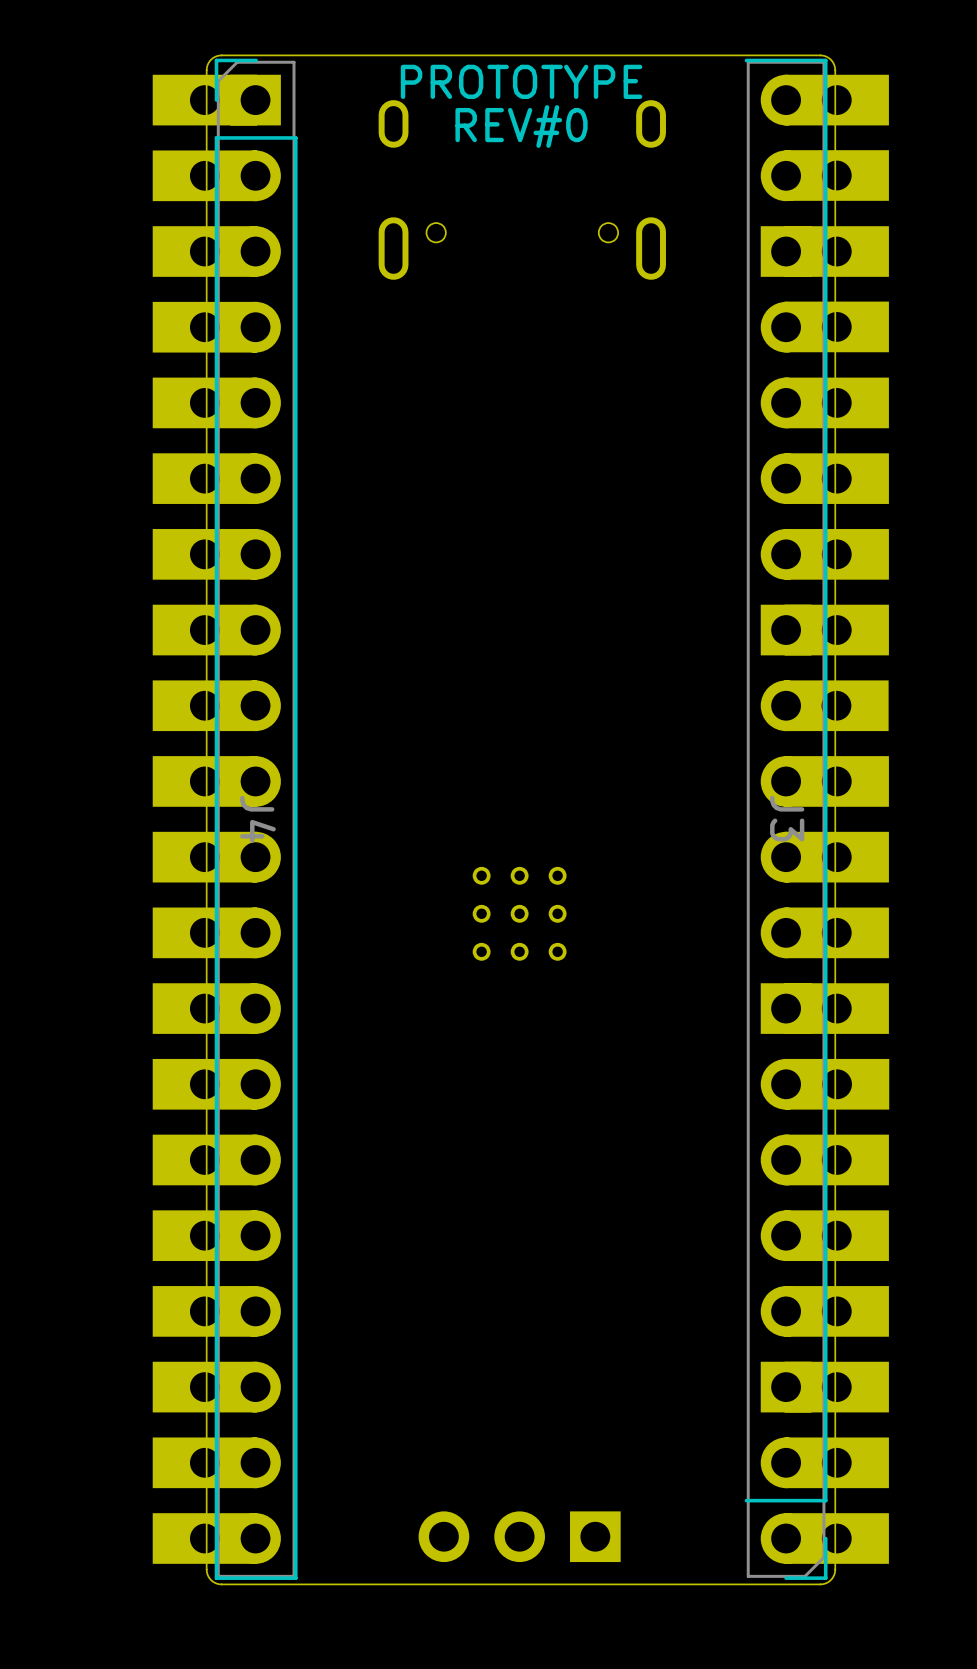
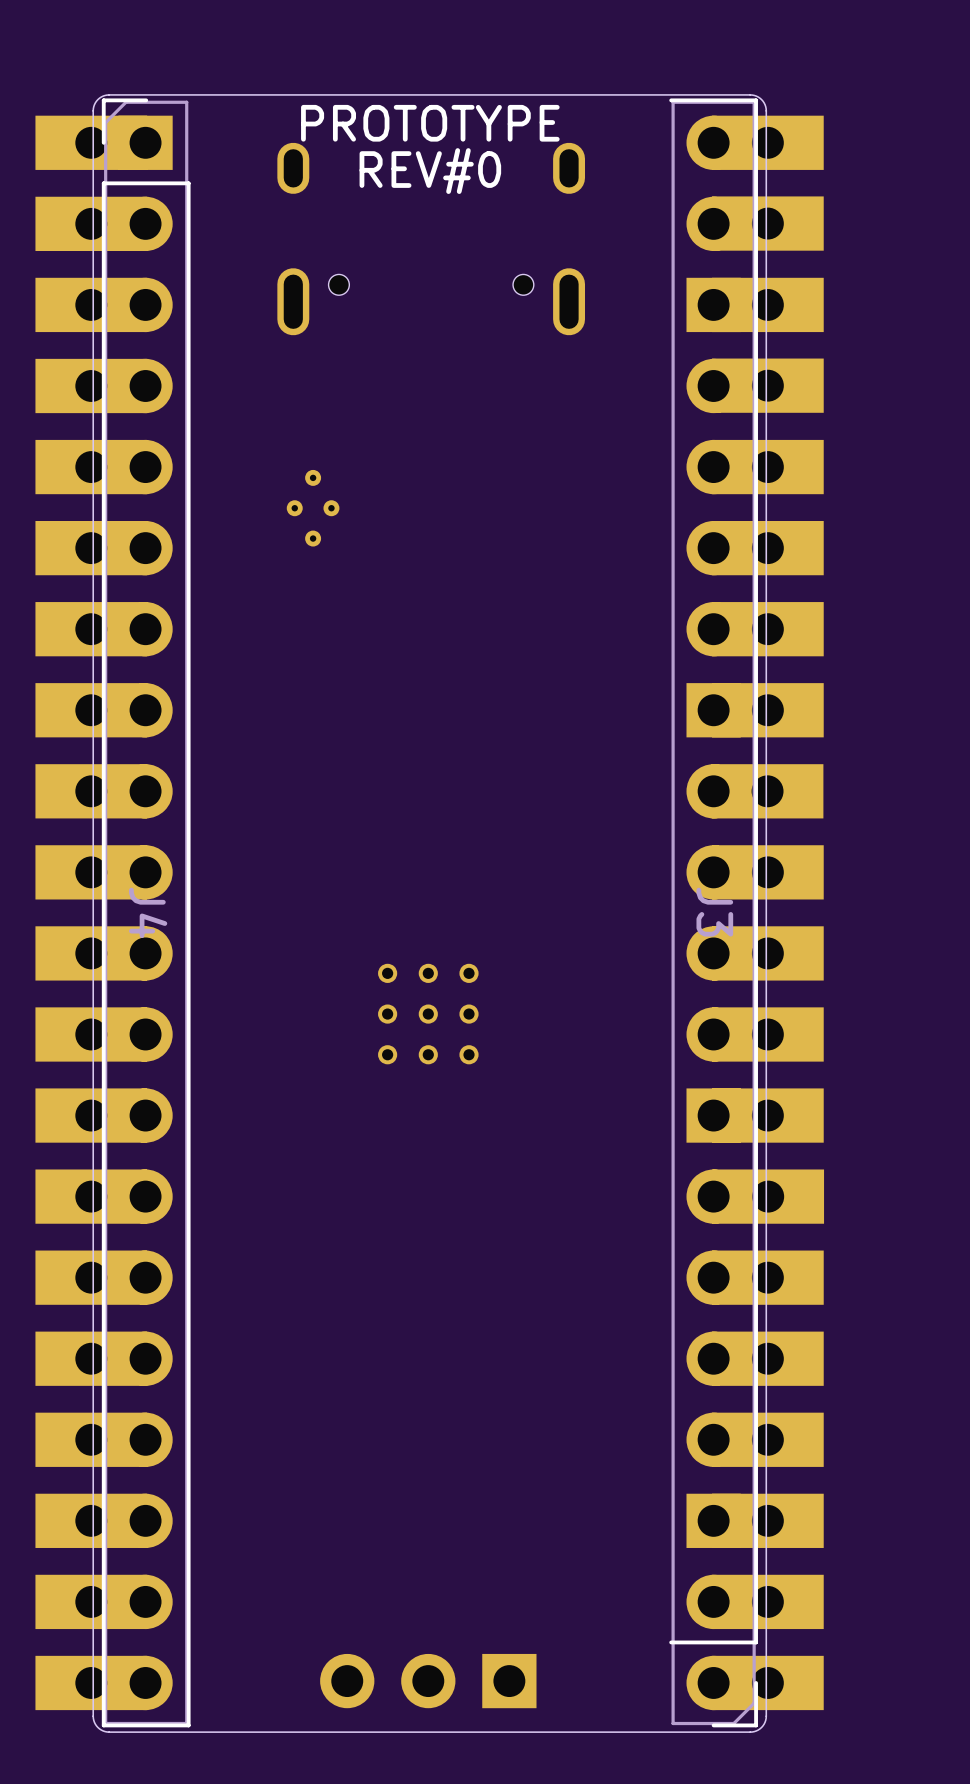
part: none -> (313, 508)

